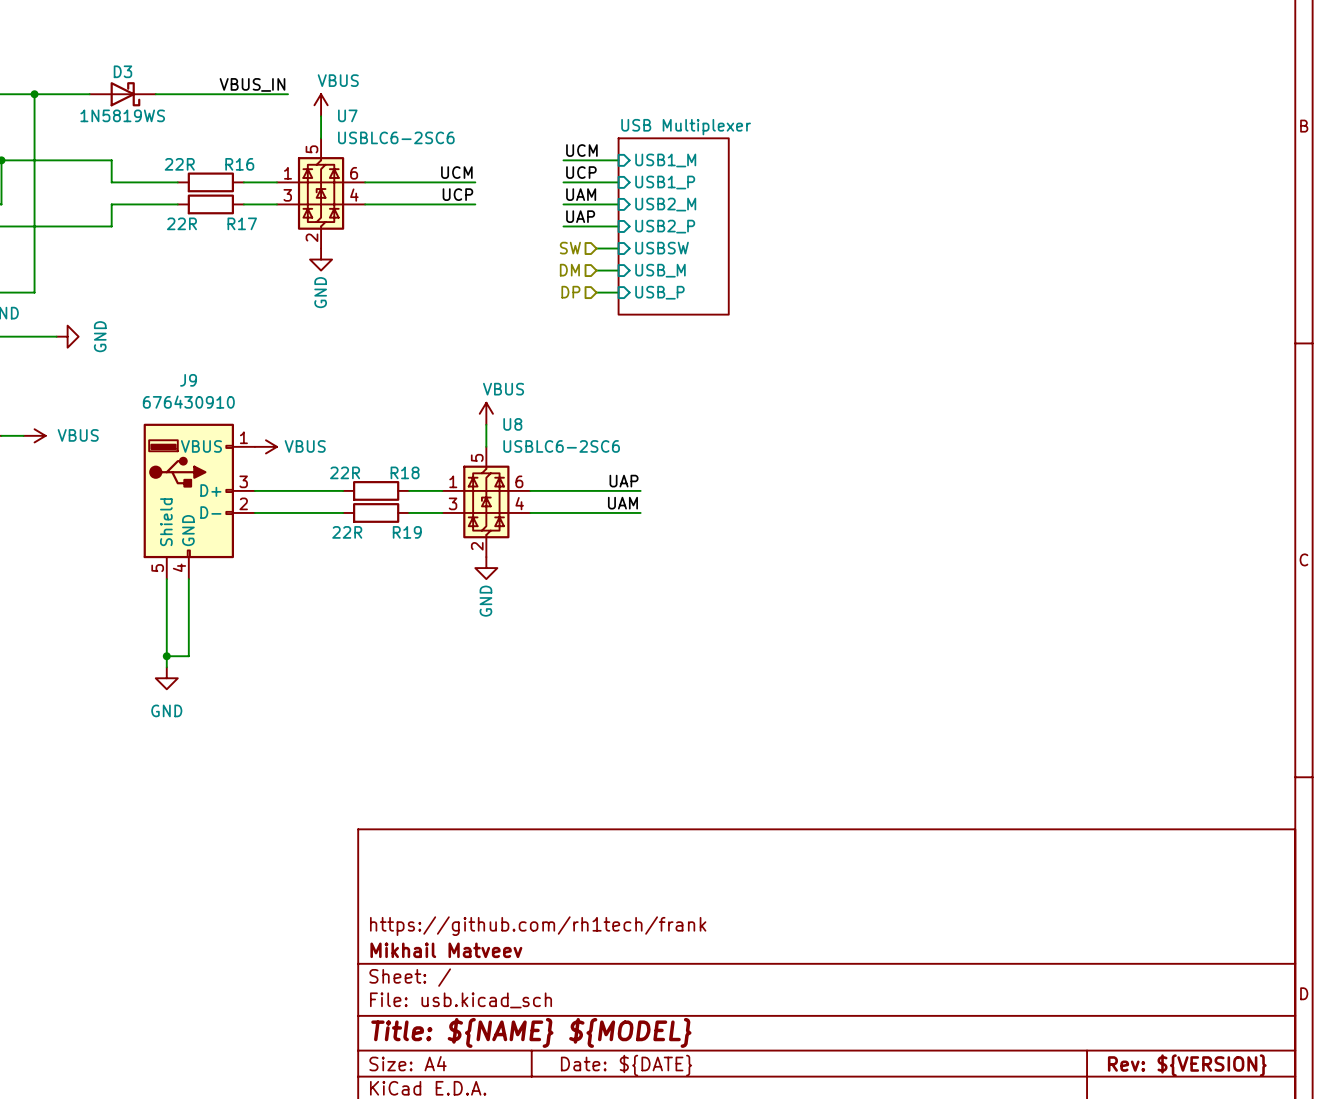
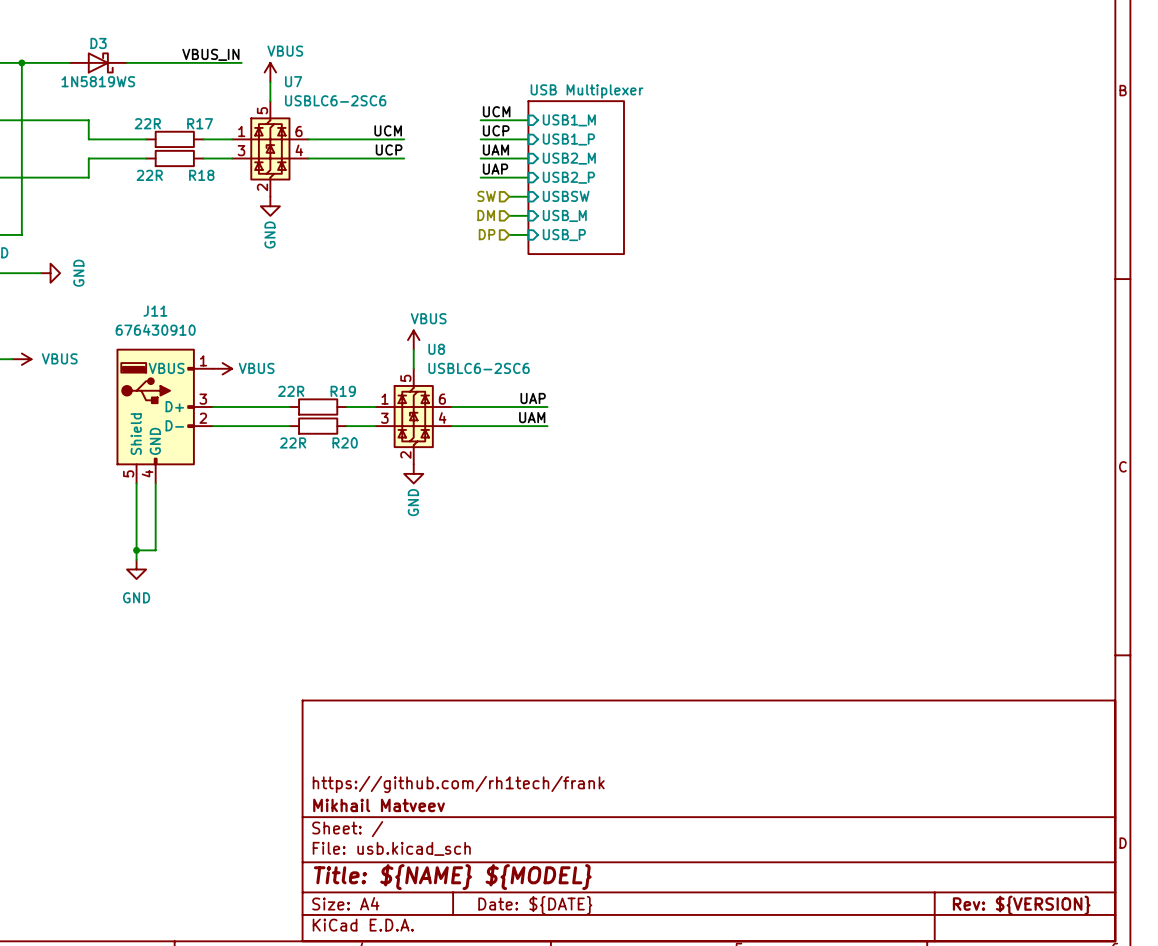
R16 name: R16 (239, 164) -> R17 (200, 123)
R17 name: R17 (242, 223) -> R18 (201, 175)
J9 name: J9 (188, 380) -> J11 (155, 311)
R18 name: R18 (405, 472) -> R19 (343, 391)
R19 name: R19 (407, 532) -> R20 (345, 442)

